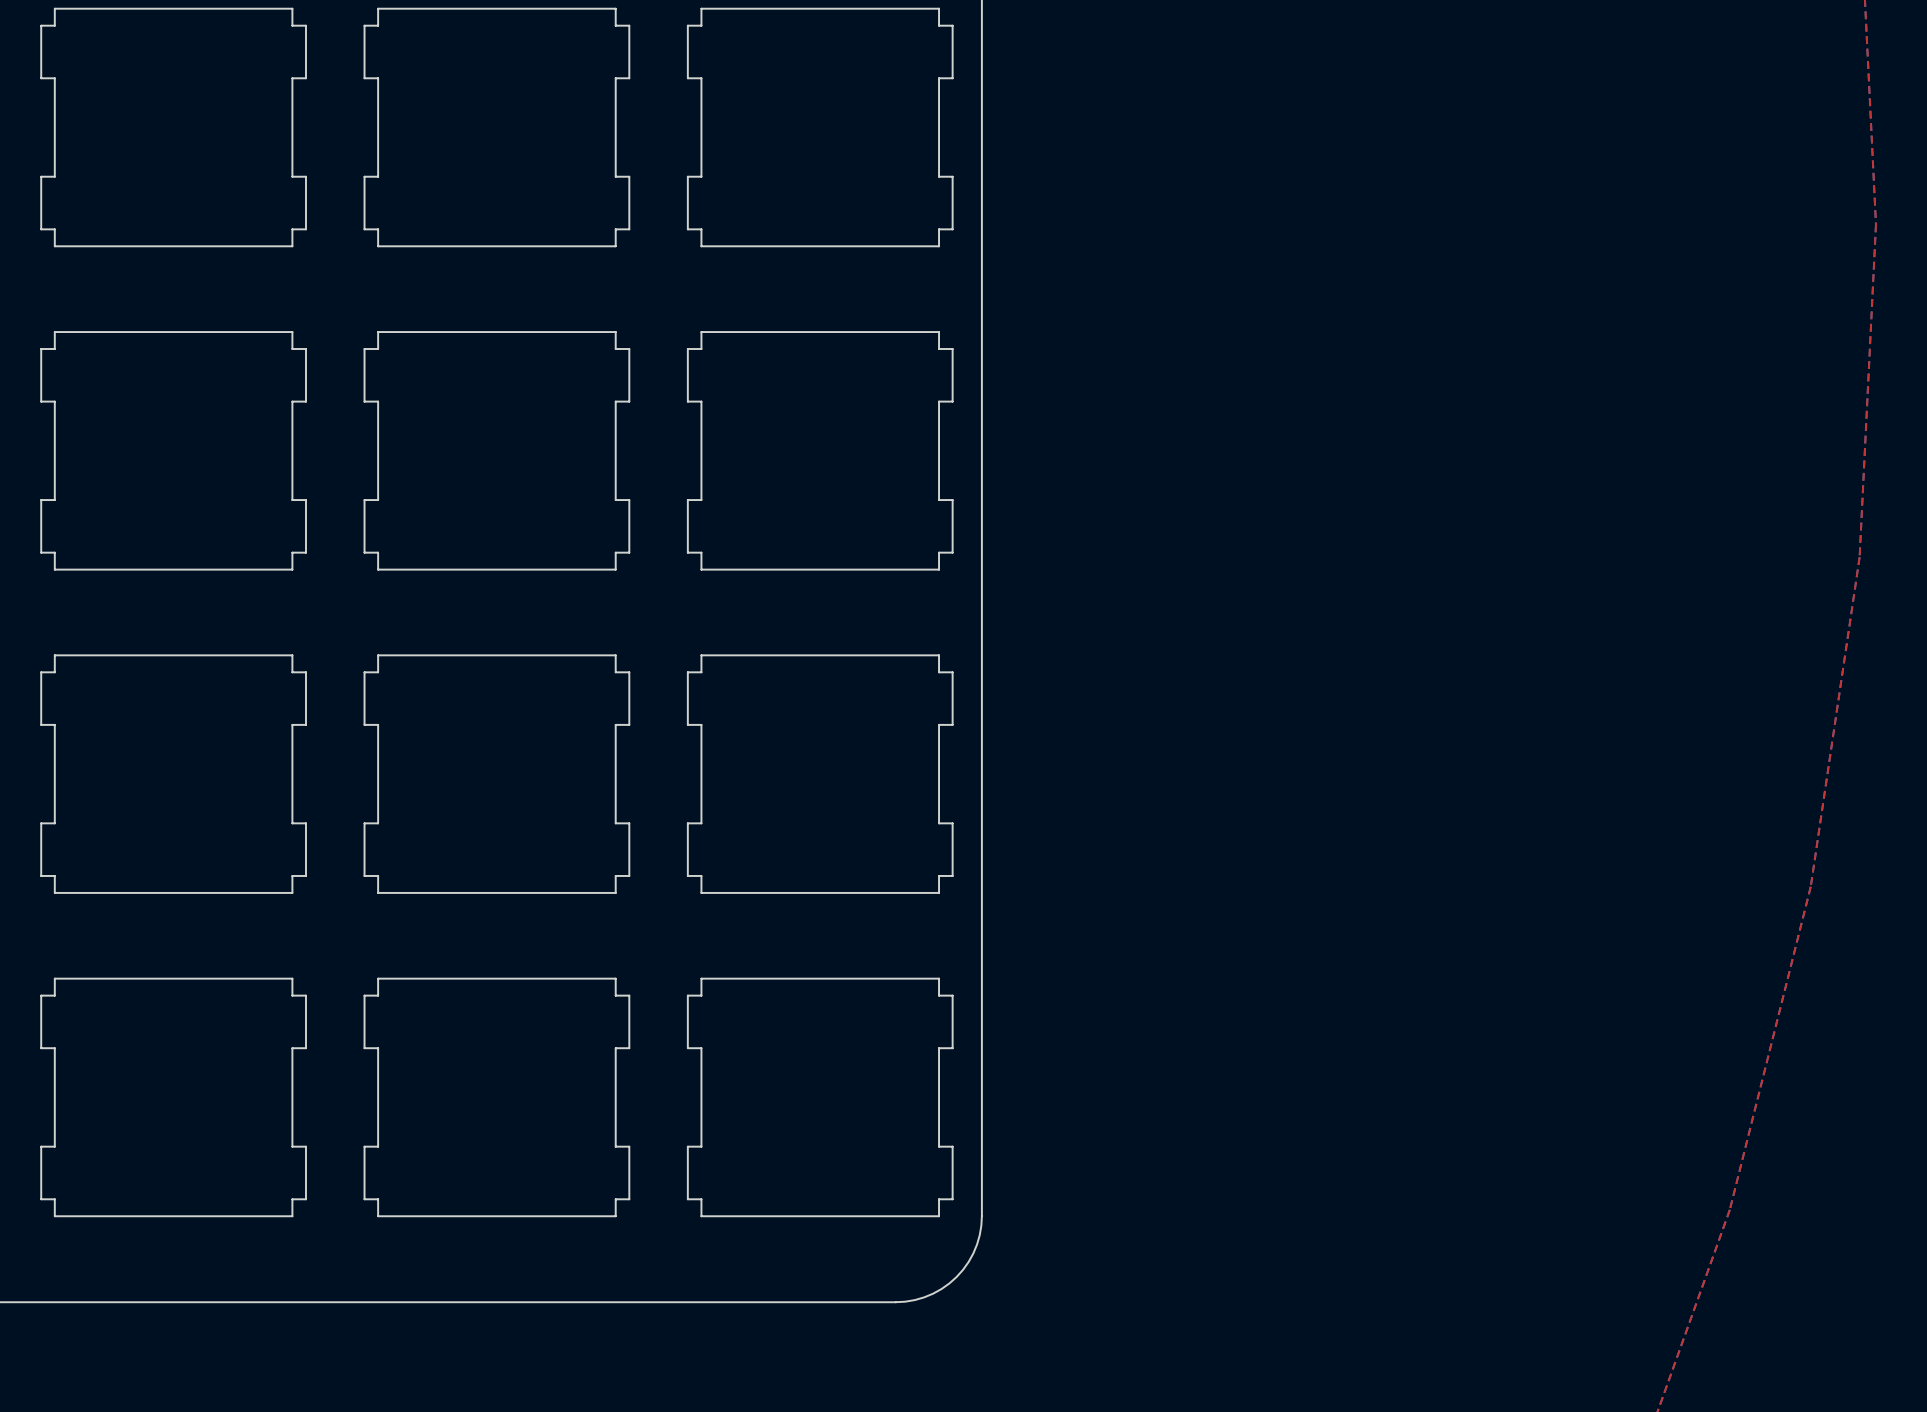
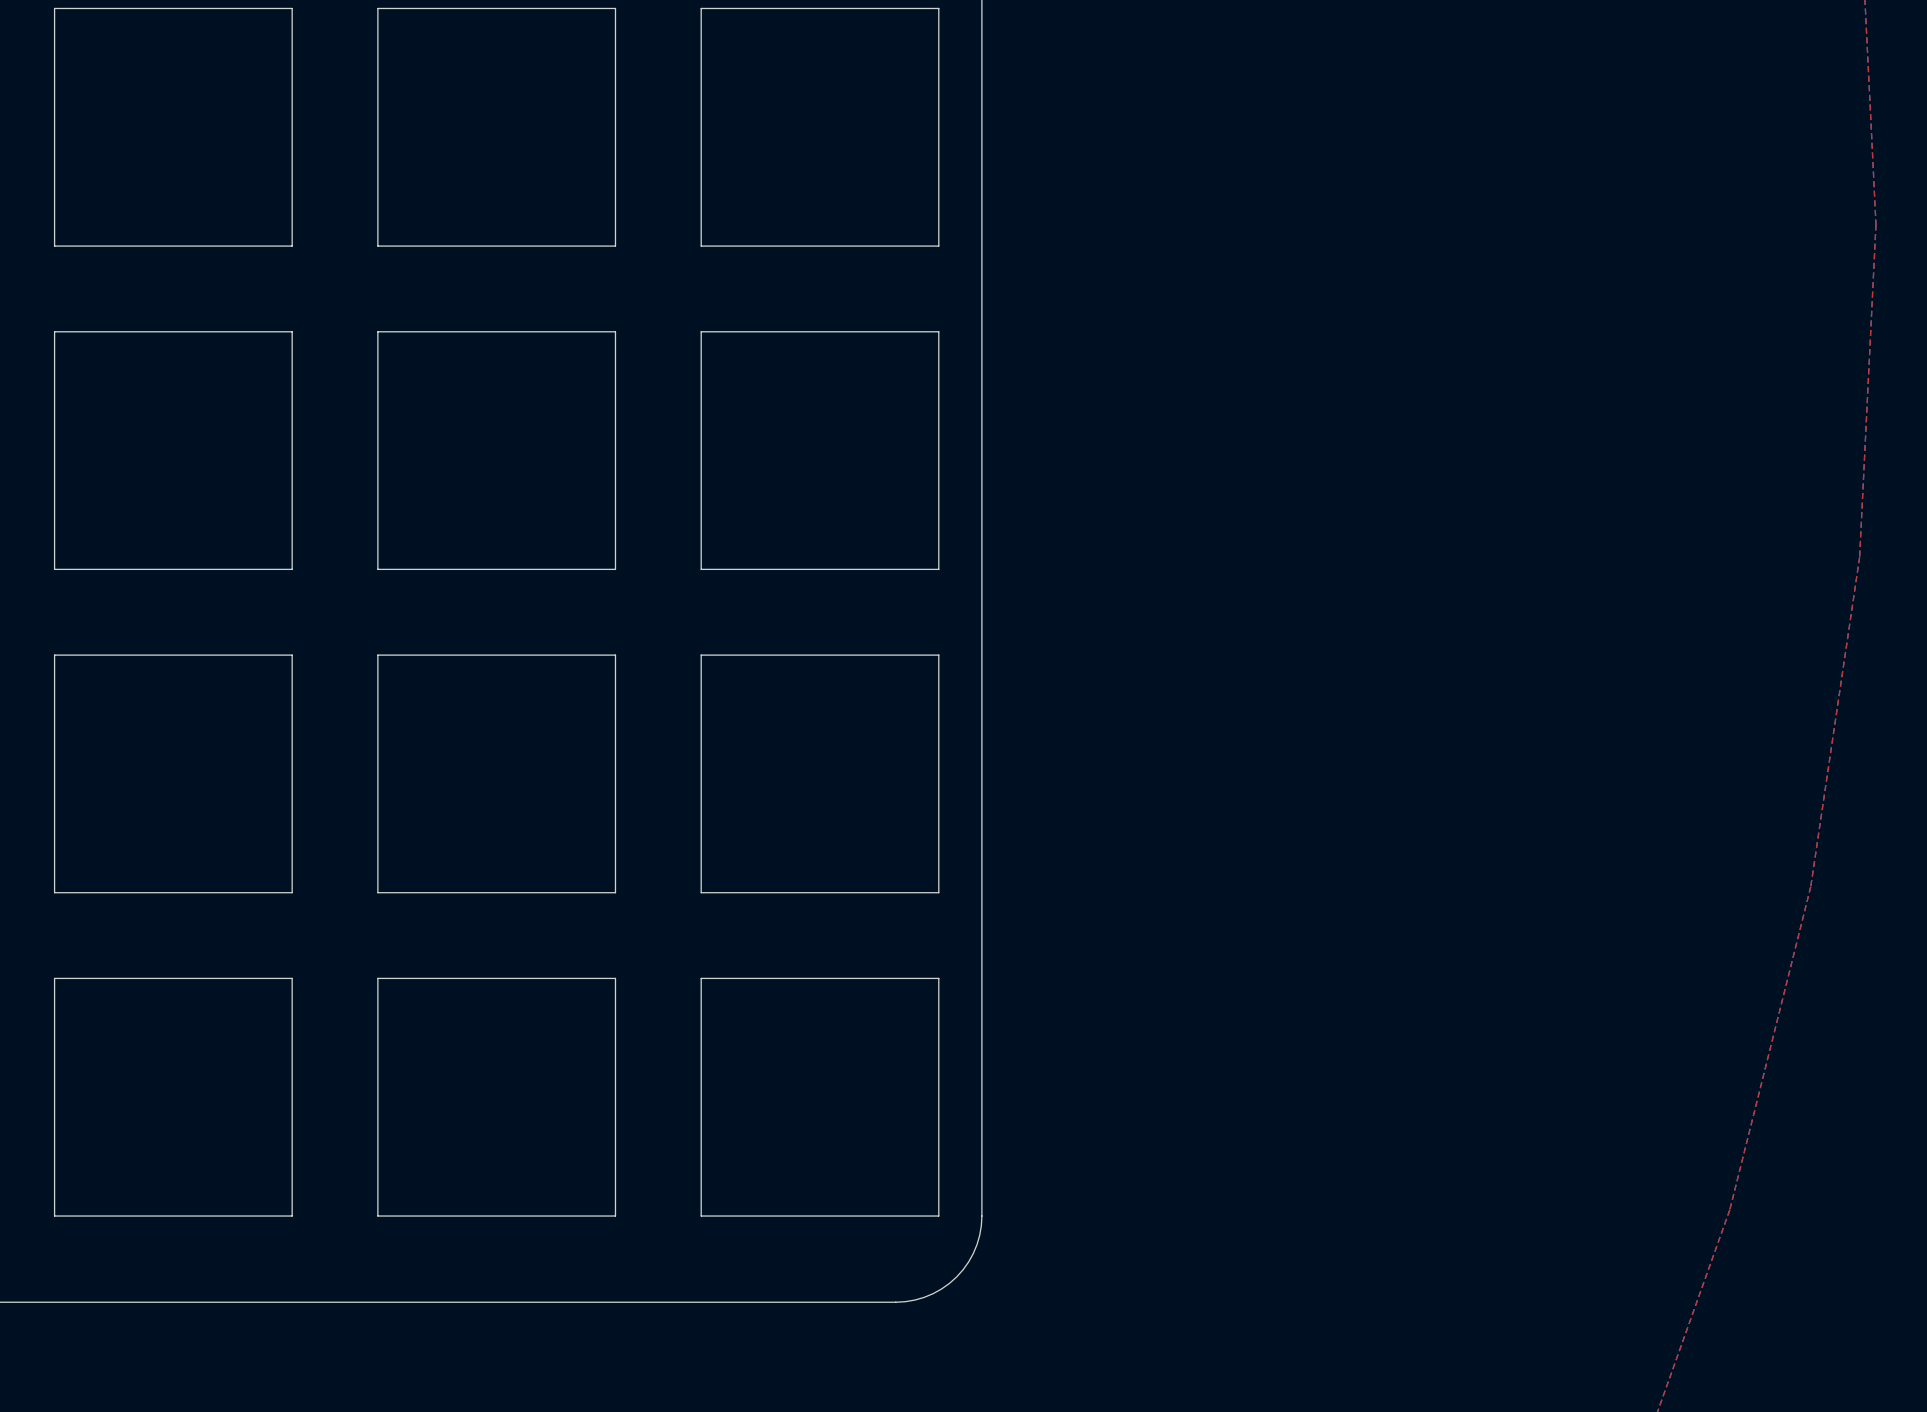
board edge: (54, 8) (54, 25) (41, 25) (41, 78) (54, 78) (54, 176) (41, 176) (41, 229) (54, 229) (54, 246) (292, 246) (292, 229) (305, 229) (305, 176) (292, 176) (292, 78) (305, 78) (305, 25) (292, 25) (292, 8) (54, 8) -> (54, 8) (54, 246) (292, 246) (292, 8) (54, 8)
board edge: (378, 8) (378, 25) (364, 25) (364, 78) (378, 78) (378, 176) (364, 176) (364, 229) (378, 229) (378, 246) (615, 246) (615, 229) (629, 229) (629, 176) (615, 176) (615, 78) (629, 78) (629, 25) (615, 25) (615, 8) (378, 8) -> (377, 8) (377, 246) (615, 246) (615, 8) (377, 8)
board edge: (701, 8) (701, 25) (687, 25) (687, 78) (701, 78) (701, 176) (687, 176) (687, 229) (701, 229) (701, 246) (939, 246) (939, 229) (952, 229) (952, 176) (939, 176) (939, 78) (952, 78) (952, 25) (939, 25) (939, 8) (701, 8) -> (701, 8) (701, 246) (938, 246) (938, 8) (701, 8)
board edge: (54, 332) (54, 349) (41, 349) (41, 401) (54, 401) (54, 500) (41, 500) (41, 552) (54, 552) (54, 569) (292, 569) (292, 552) (305, 552) (305, 500) (292, 500) (292, 401) (305, 401) (305, 349) (292, 349) (292, 332) (54, 332) -> (54, 331) (54, 569) (292, 569) (292, 331) (54, 331)
board edge: (378, 332) (378, 349) (364, 349) (364, 401) (378, 401) (378, 500) (364, 500) (364, 552) (378, 552) (378, 569) (615, 569) (615, 552) (629, 552) (629, 500) (615, 500) (615, 401) (629, 401) (629, 349) (615, 349) (615, 332) (378, 332) -> (377, 331) (377, 569) (615, 569) (615, 331) (377, 331)
board edge: (701, 332) (701, 349) (687, 349) (687, 401) (701, 401) (701, 500) (687, 500) (687, 552) (701, 552) (701, 569) (939, 569) (939, 552) (952, 552) (952, 500) (939, 500) (939, 401) (952, 401) (952, 349) (939, 349) (939, 332) (701, 332) -> (701, 331) (701, 569) (938, 569) (938, 331) (701, 331)
board edge: (54, 655) (292, 655) (292, 672) (305, 672) (305, 724) (292, 724) (292, 823) (305, 823) (305, 875) (292, 875) (292, 892) (54, 892) (54, 875) (41, 875) (41, 823) (54, 823) (54, 724) (41, 724) (41, 672) (54, 672) (54, 655) -> (54, 655) (54, 892) (292, 892) (292, 655) (54, 655)
board edge: (378, 655) (378, 672) (364, 672) (364, 724) (378, 724) (378, 823) (364, 823) (364, 875) (378, 875) (378, 892) (615, 892) (615, 875) (629, 875) (629, 823) (615, 823) (615, 724) (629, 724) (629, 672) (615, 672) (615, 655) (378, 655) -> (377, 655) (377, 892) (615, 892) (615, 655) (377, 655)
board edge: (701, 655) (939, 655) (939, 672) (952, 672) (952, 724) (939, 724) (939, 823) (952, 823) (952, 875) (939, 875) (939, 892) (701, 892) (701, 875) (687, 875) (687, 823) (701, 823) (701, 724) (687, 724) (687, 672) (701, 672) (701, 655) -> (701, 655) (701, 892) (938, 892) (938, 655) (701, 655)
board edge: (54, 978) (292, 978) (292, 995) (305, 995) (305, 1048) (292, 1048) (292, 1146) (305, 1146) (305, 1199) (292, 1199) (292, 1216) (54, 1216) (54, 1199) (41, 1199) (41, 1146) (54, 1146) (54, 1048) (41, 1048) (41, 995) (54, 995) (54, 978) -> (54, 978) (54, 1216) (292, 1216) (292, 978) (54, 978)
board edge: (378, 978) (378, 995) (364, 995) (364, 1048) (378, 1048) (378, 1146) (364, 1146) (364, 1199) (378, 1199) (378, 1216) (615, 1216) (615, 1199) (629, 1199) (629, 1146) (615, 1146) (615, 1048) (629, 1048) (629, 995) (615, 995) (615, 978) (378, 978) -> (377, 978) (377, 1216) (615, 1216) (615, 978) (377, 978)
board edge: (701, 978) (939, 978) (939, 995) (952, 995) (952, 1048) (939, 1048) (939, 1146) (952, 1146) (952, 1199) (939, 1199) (939, 1216) (701, 1216) (701, 1199) (687, 1199) (687, 1146) (701, 1146) (701, 1048) (687, 1048) (687, 995) (701, 995) (701, 978) -> (701, 978) (701, 1216) (938, 1216) (938, 978) (701, 978)

